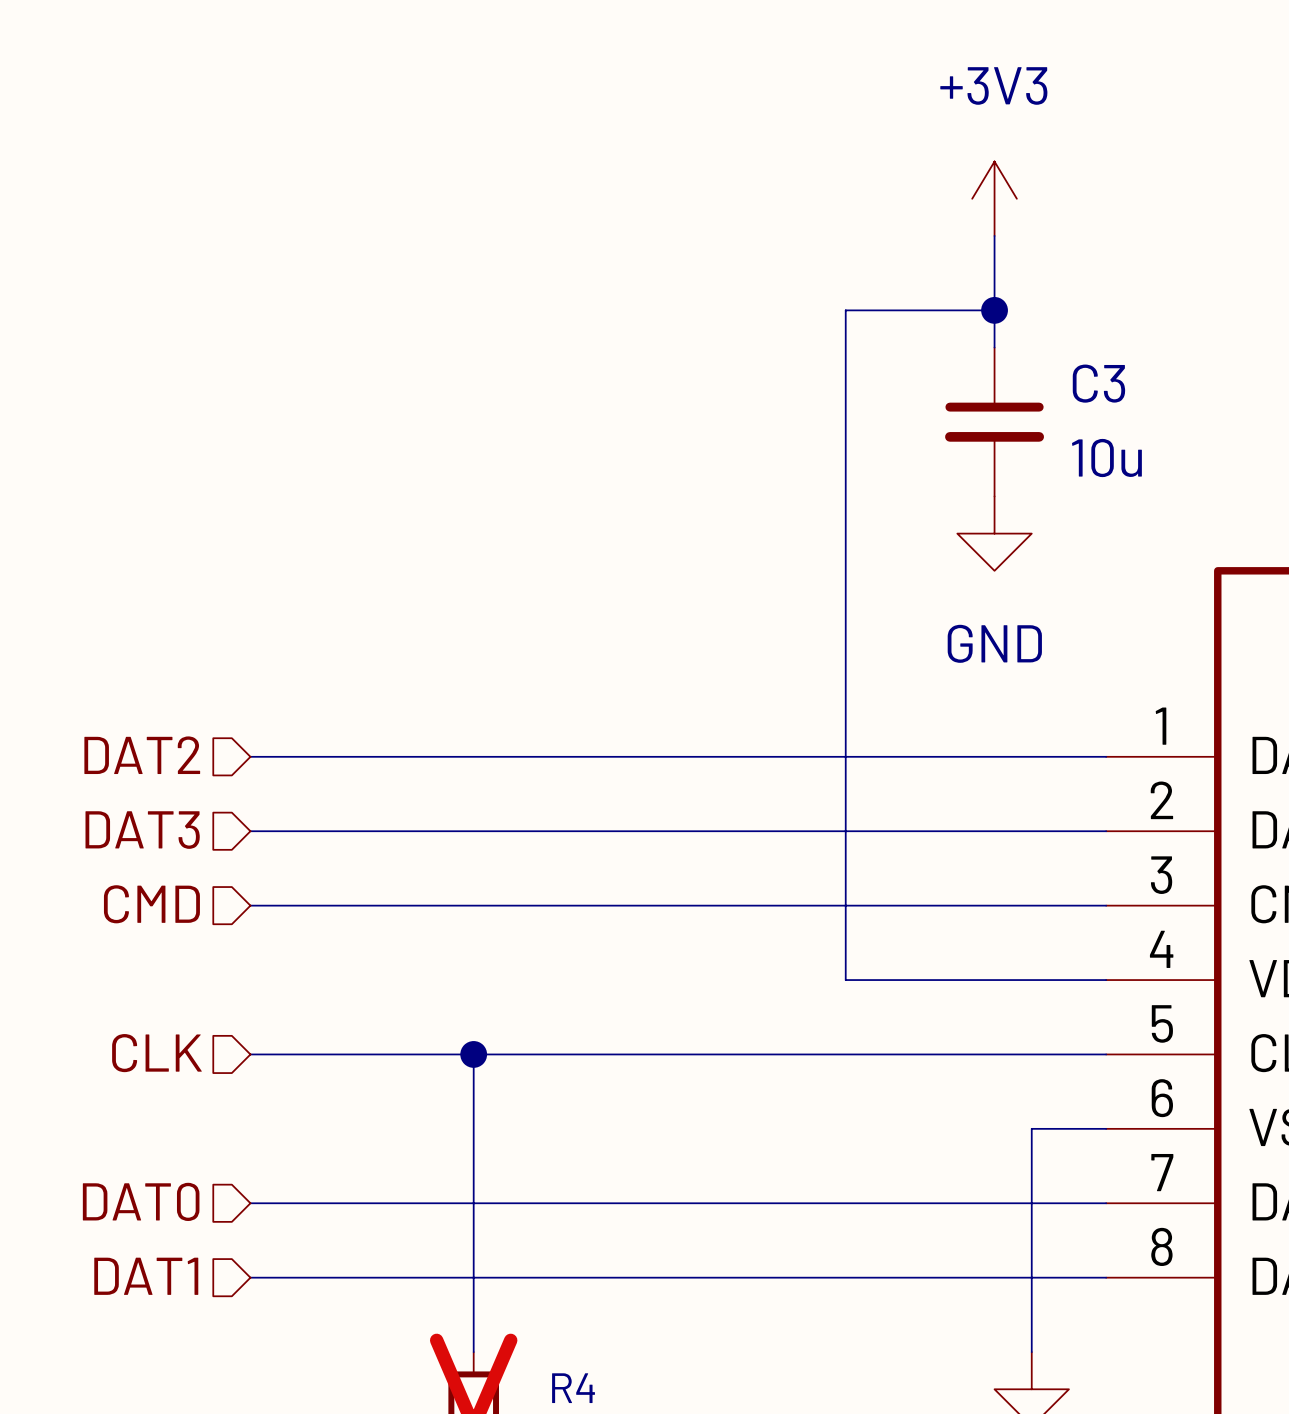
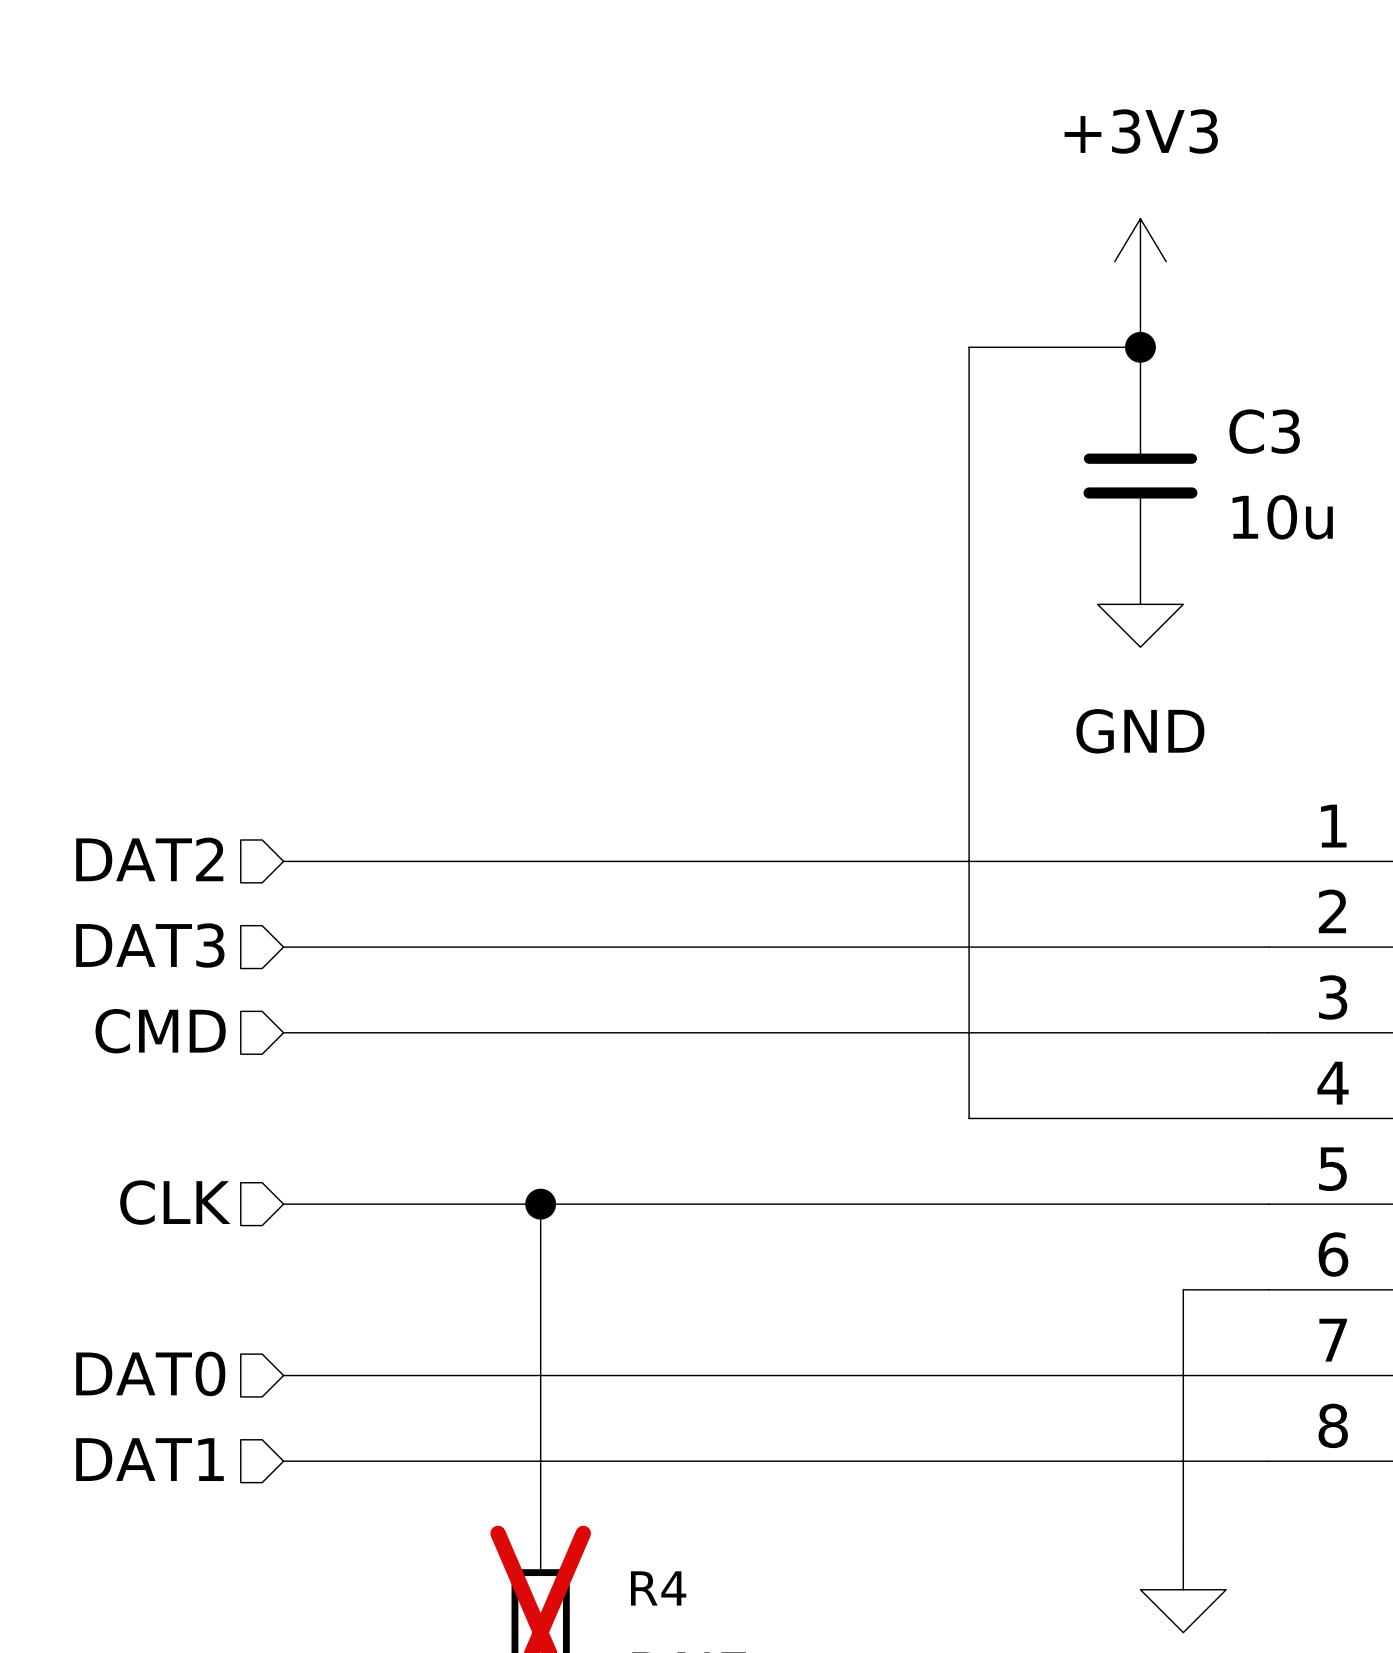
power symbol position: +3V3 (994, 198) -> +3V3 (1140, 261)

